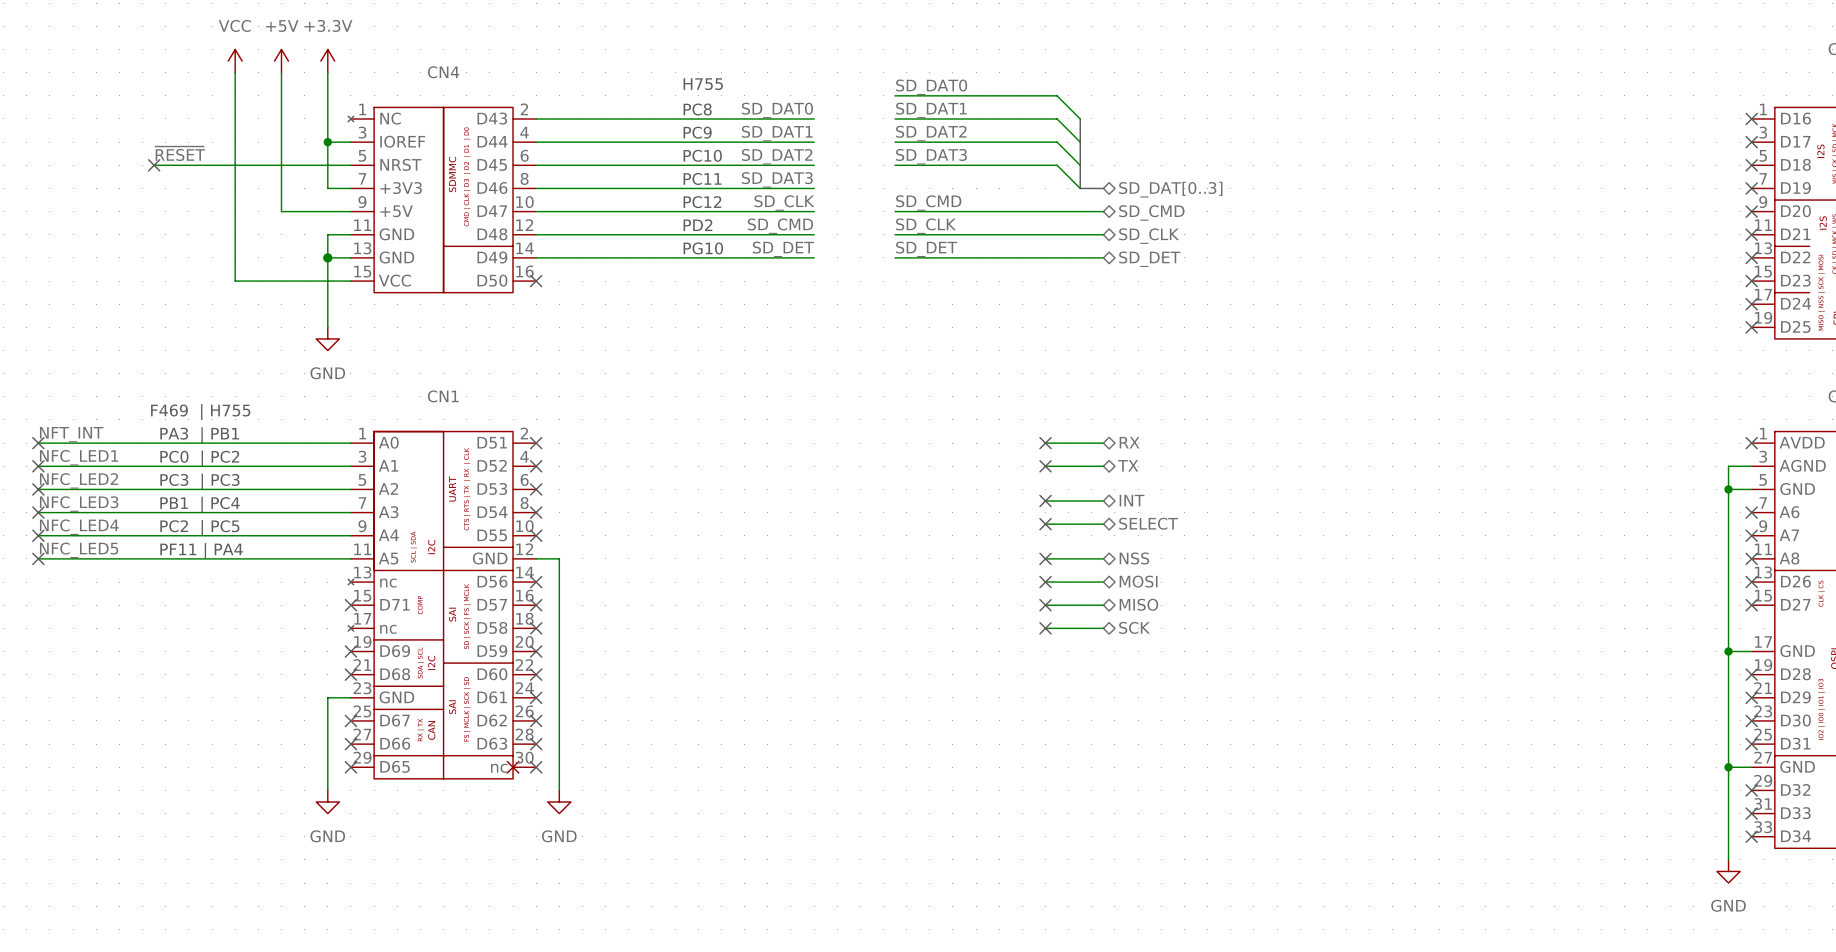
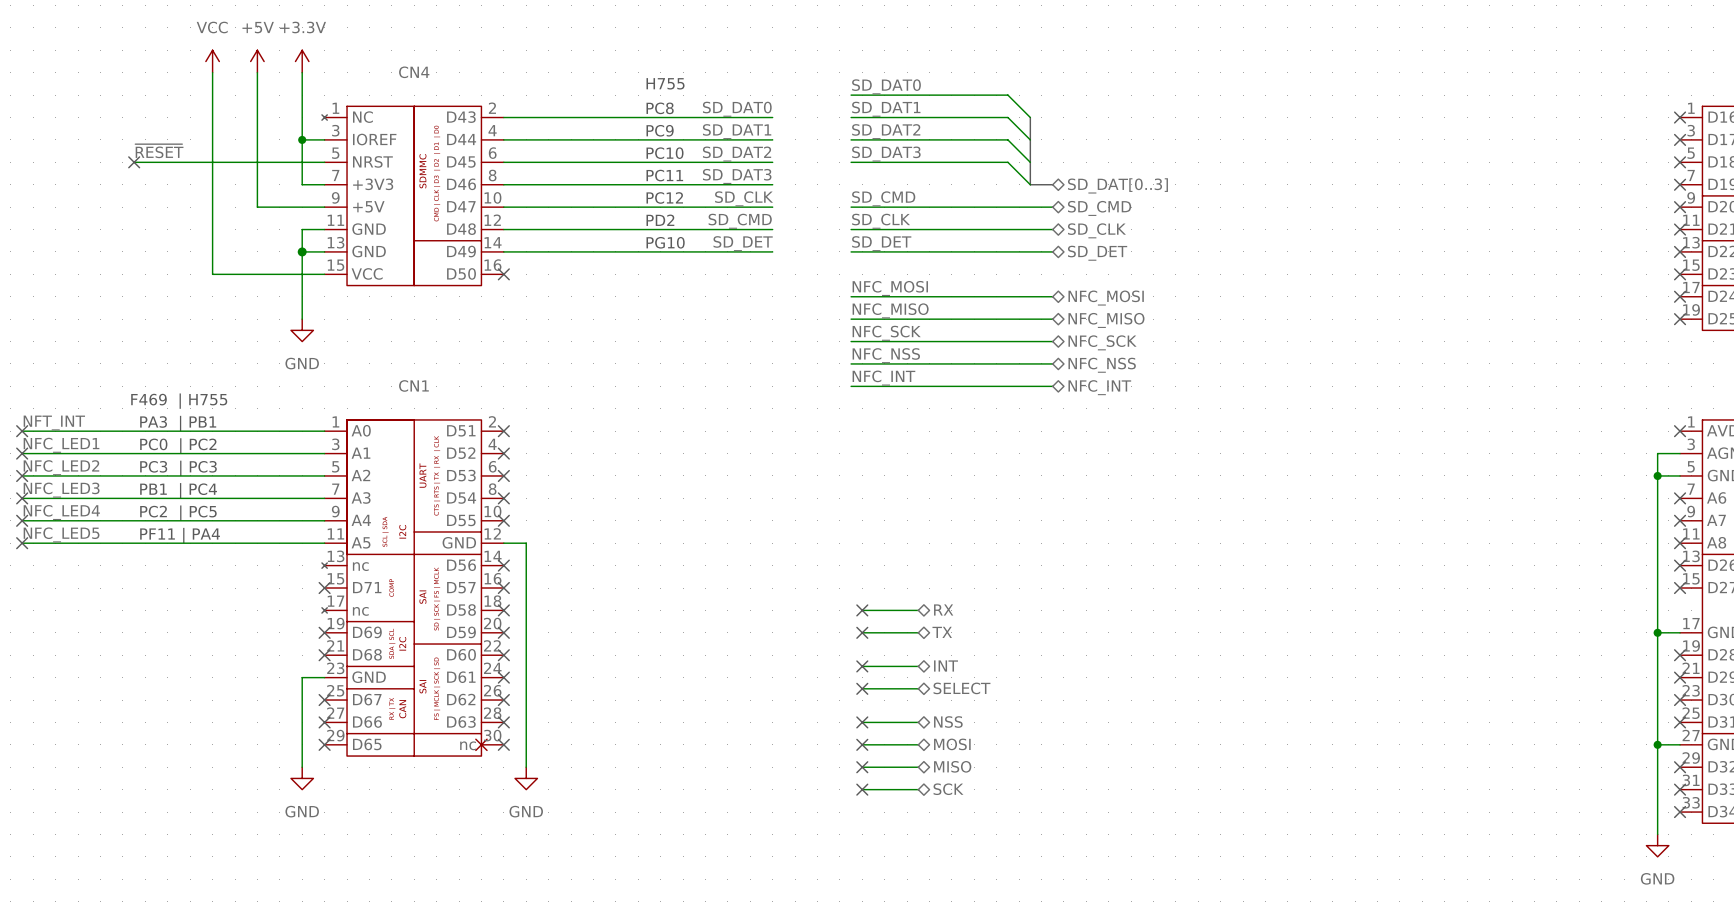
label: none -> NFC_MOSI (890, 288)
wire: none -> (851, 296) (1052, 296)
hierarchical label: none -> NFC_MOSI (1106, 298)
label: none -> NFC_MISO (890, 310)
wire: none -> (851, 319) (1052, 319)
hierarchical label: none -> NFC_MISO (1106, 320)
label: none -> NFC_SCK (886, 333)
wire: none -> (851, 341) (1052, 341)
hierarchical label: none -> NFC_SCK (1102, 342)
label: none -> NFC_NSS (886, 355)
wire: none -> (851, 363) (1052, 363)
hierarchical label: none -> NFC_NSS (1102, 365)
label: none -> NFC_INT (883, 378)
wire: none -> (851, 386) (1052, 386)
hierarchical label: none -> NFC_INT (1099, 387)
hierarchical label: RX (1129, 442) -> none
wire: (1045, 443) (1103, 443) -> none
no-connect mark: (1045, 443) -> none
hierarchical label: TX (1128, 465) -> none
wire: (1045, 466) (1103, 466) -> (862, 610) (918, 610)
no-connect mark: (1045, 466) -> none
hierarchical label: INT (1132, 500) -> none
wire: (1045, 501) (1103, 501) -> (862, 632) (918, 632)
no-connect mark: (1045, 501) -> none
hierarchical label: SELECT (1148, 523) -> none
wire: (1045, 524) (1103, 524) -> (862, 666) (918, 666)
no-connect mark: (1045, 524) -> none
wire: (1045, 558) (1103, 558) -> (862, 688) (918, 688)
no-connect mark: (1045, 558) -> none
hierarchical label: NSS (1134, 558) -> none
hierarchical label: MOSI (1138, 581) -> none
wire: (1045, 582) (1103, 582) -> (862, 722) (918, 722)
no-connect mark: (1045, 582) -> none
hierarchical label: MISO (1138, 604) -> none
wire: (1045, 605) (1103, 605) -> (862, 744) (918, 744)
no-connect mark: (1045, 605) -> none
hierarchical label: none -> RX (943, 609)
hierarchical label: SCK (1134, 627) -> none
no-connect mark: none -> (862, 610)
wire: (1045, 628) (1103, 628) -> (862, 767) (918, 767)
no-connect mark: (1045, 628) -> none
no-connect mark: none -> (862, 632)
hierarchical label: none -> TX (942, 632)
hierarchical label: none -> INT (946, 665)
no-connect mark: none -> (862, 666)
hierarchical label: none -> SELECT (961, 688)
no-connect mark: none -> (862, 688)
hierarchical label: none -> NSS (948, 722)
no-connect mark: none -> (862, 722)
hierarchical label: none -> MOSI (952, 744)
no-connect mark: none -> (862, 744)
no-connect mark: none -> (862, 767)
hierarchical label: none -> MISO (952, 766)
wire: none -> (862, 789) (918, 789)
no-connect mark: none -> (862, 789)
hierarchical label: none -> SCK (948, 789)

